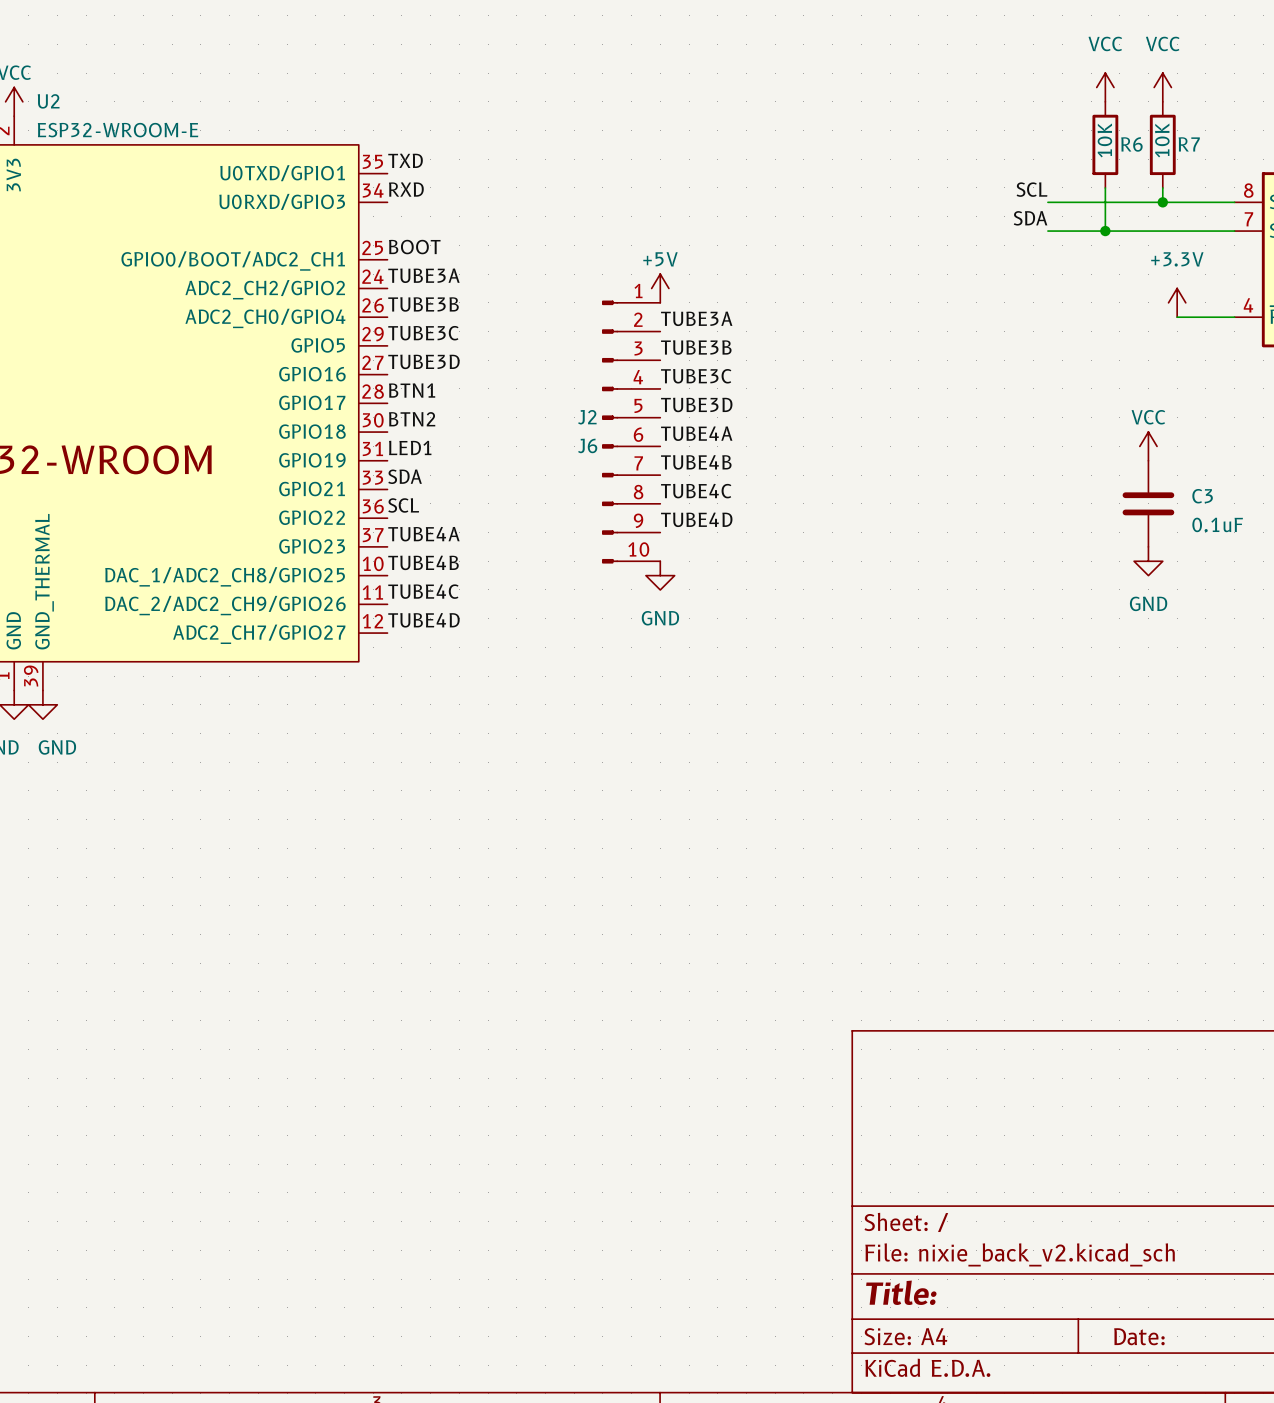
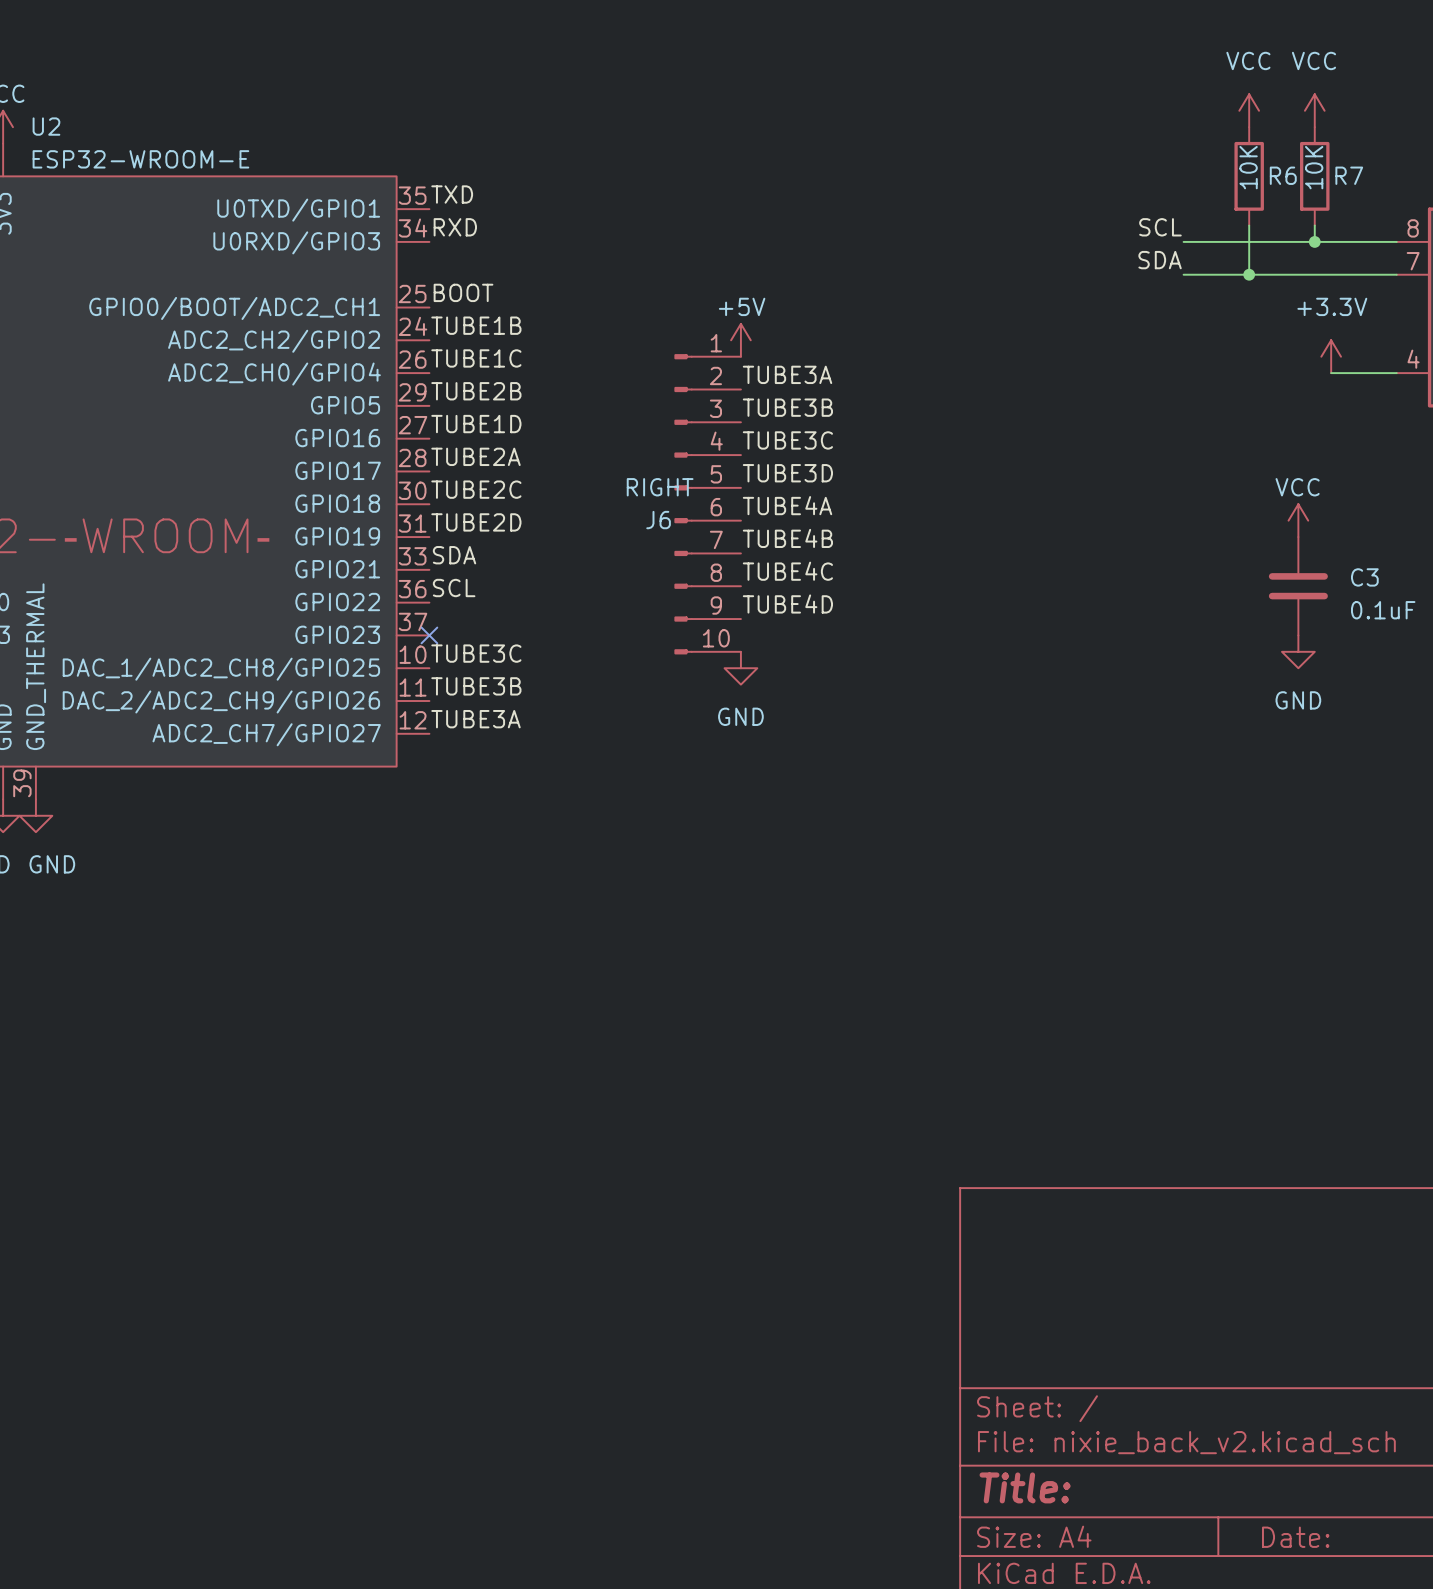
label: TUBE3A (423, 275) -> TUBE1B (476, 325)
label: TUBE3B (423, 304) -> TUBE1C (476, 358)
label: TUBE3C (423, 333) -> TUBE2B (476, 391)
label: TUBE3D (423, 361) -> TUBE1D (476, 424)
label: BTN1 (412, 390) -> TUBE2A (475, 456)
J6 value: J2 (587, 417) -> RIGHT (660, 487)
label: BTN2 (412, 419) -> TUBE2C (476, 489)
label: LED1 (410, 447) -> TUBE2D (476, 522)
label: TUBE4A (423, 534) -> none
no-connect mark: none -> (429, 635)
label: TUBE4B (423, 562) -> TUBE3C (476, 653)
label: TUBE4C (423, 591) -> TUBE3B (476, 686)
label: TUBE4D (423, 620) -> TUBE3A (475, 719)

